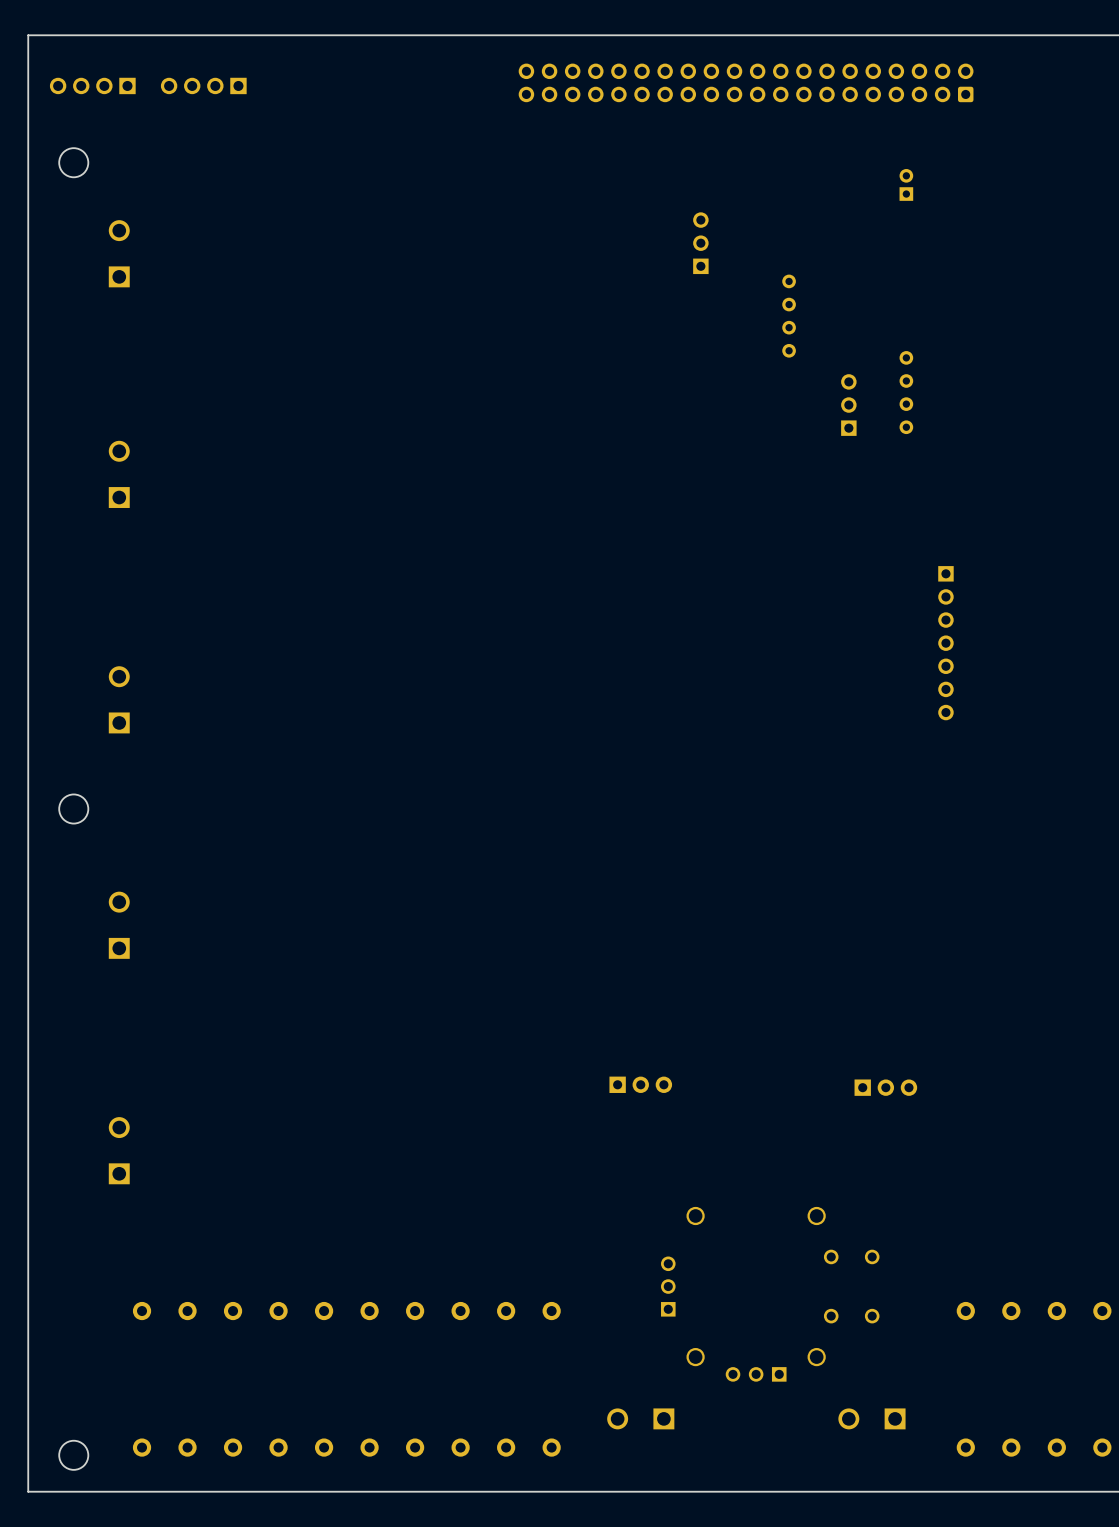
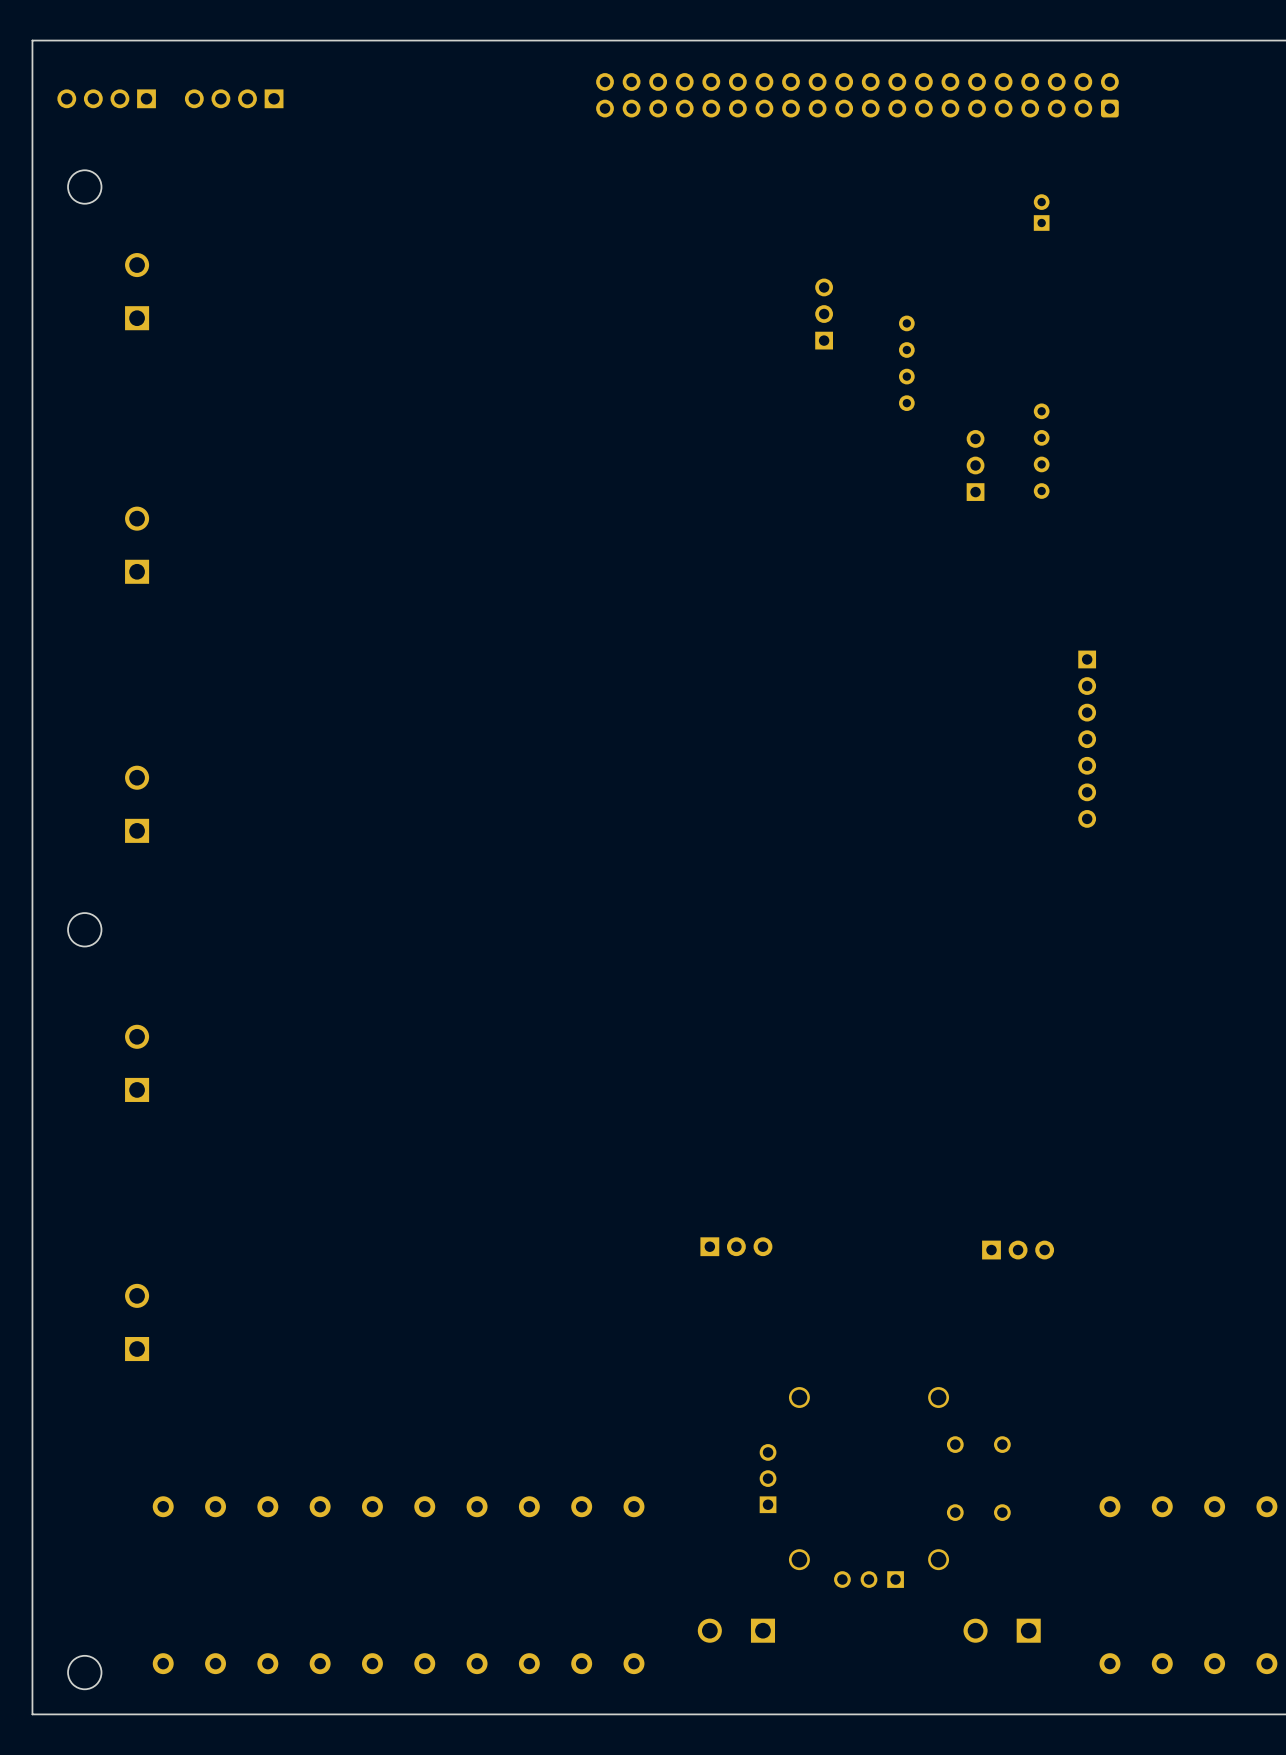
part position: (700, 243) -> (824, 314)

